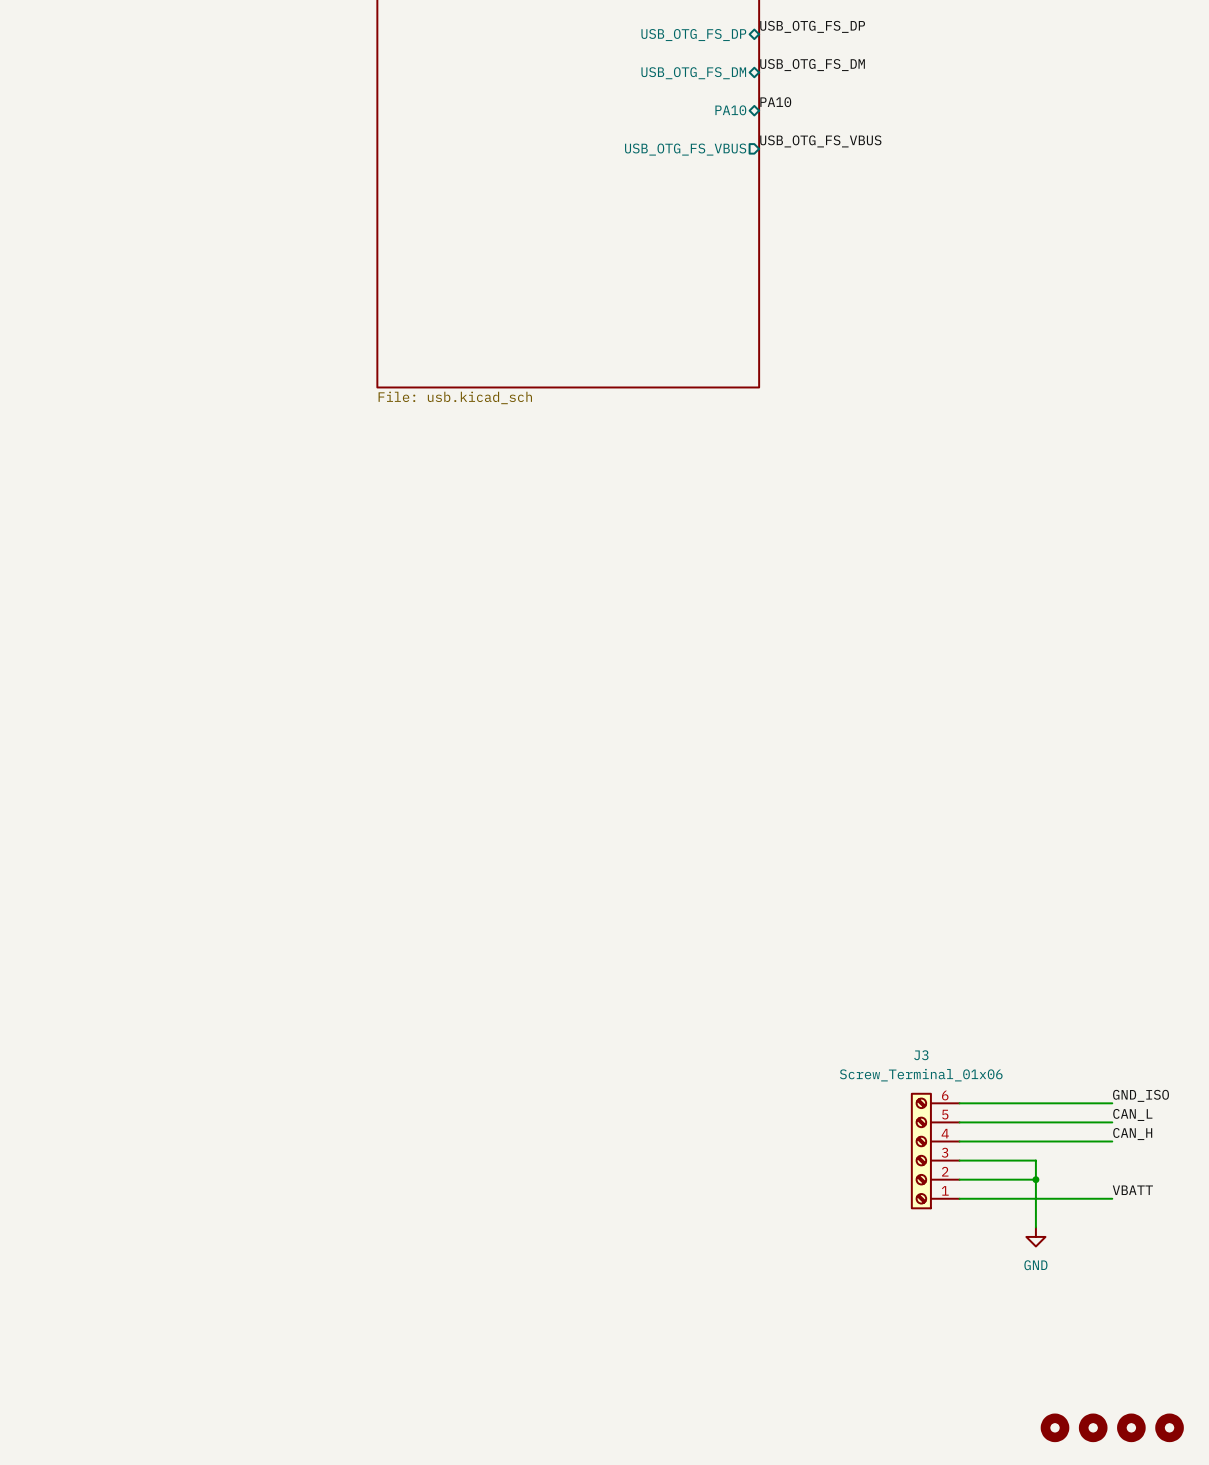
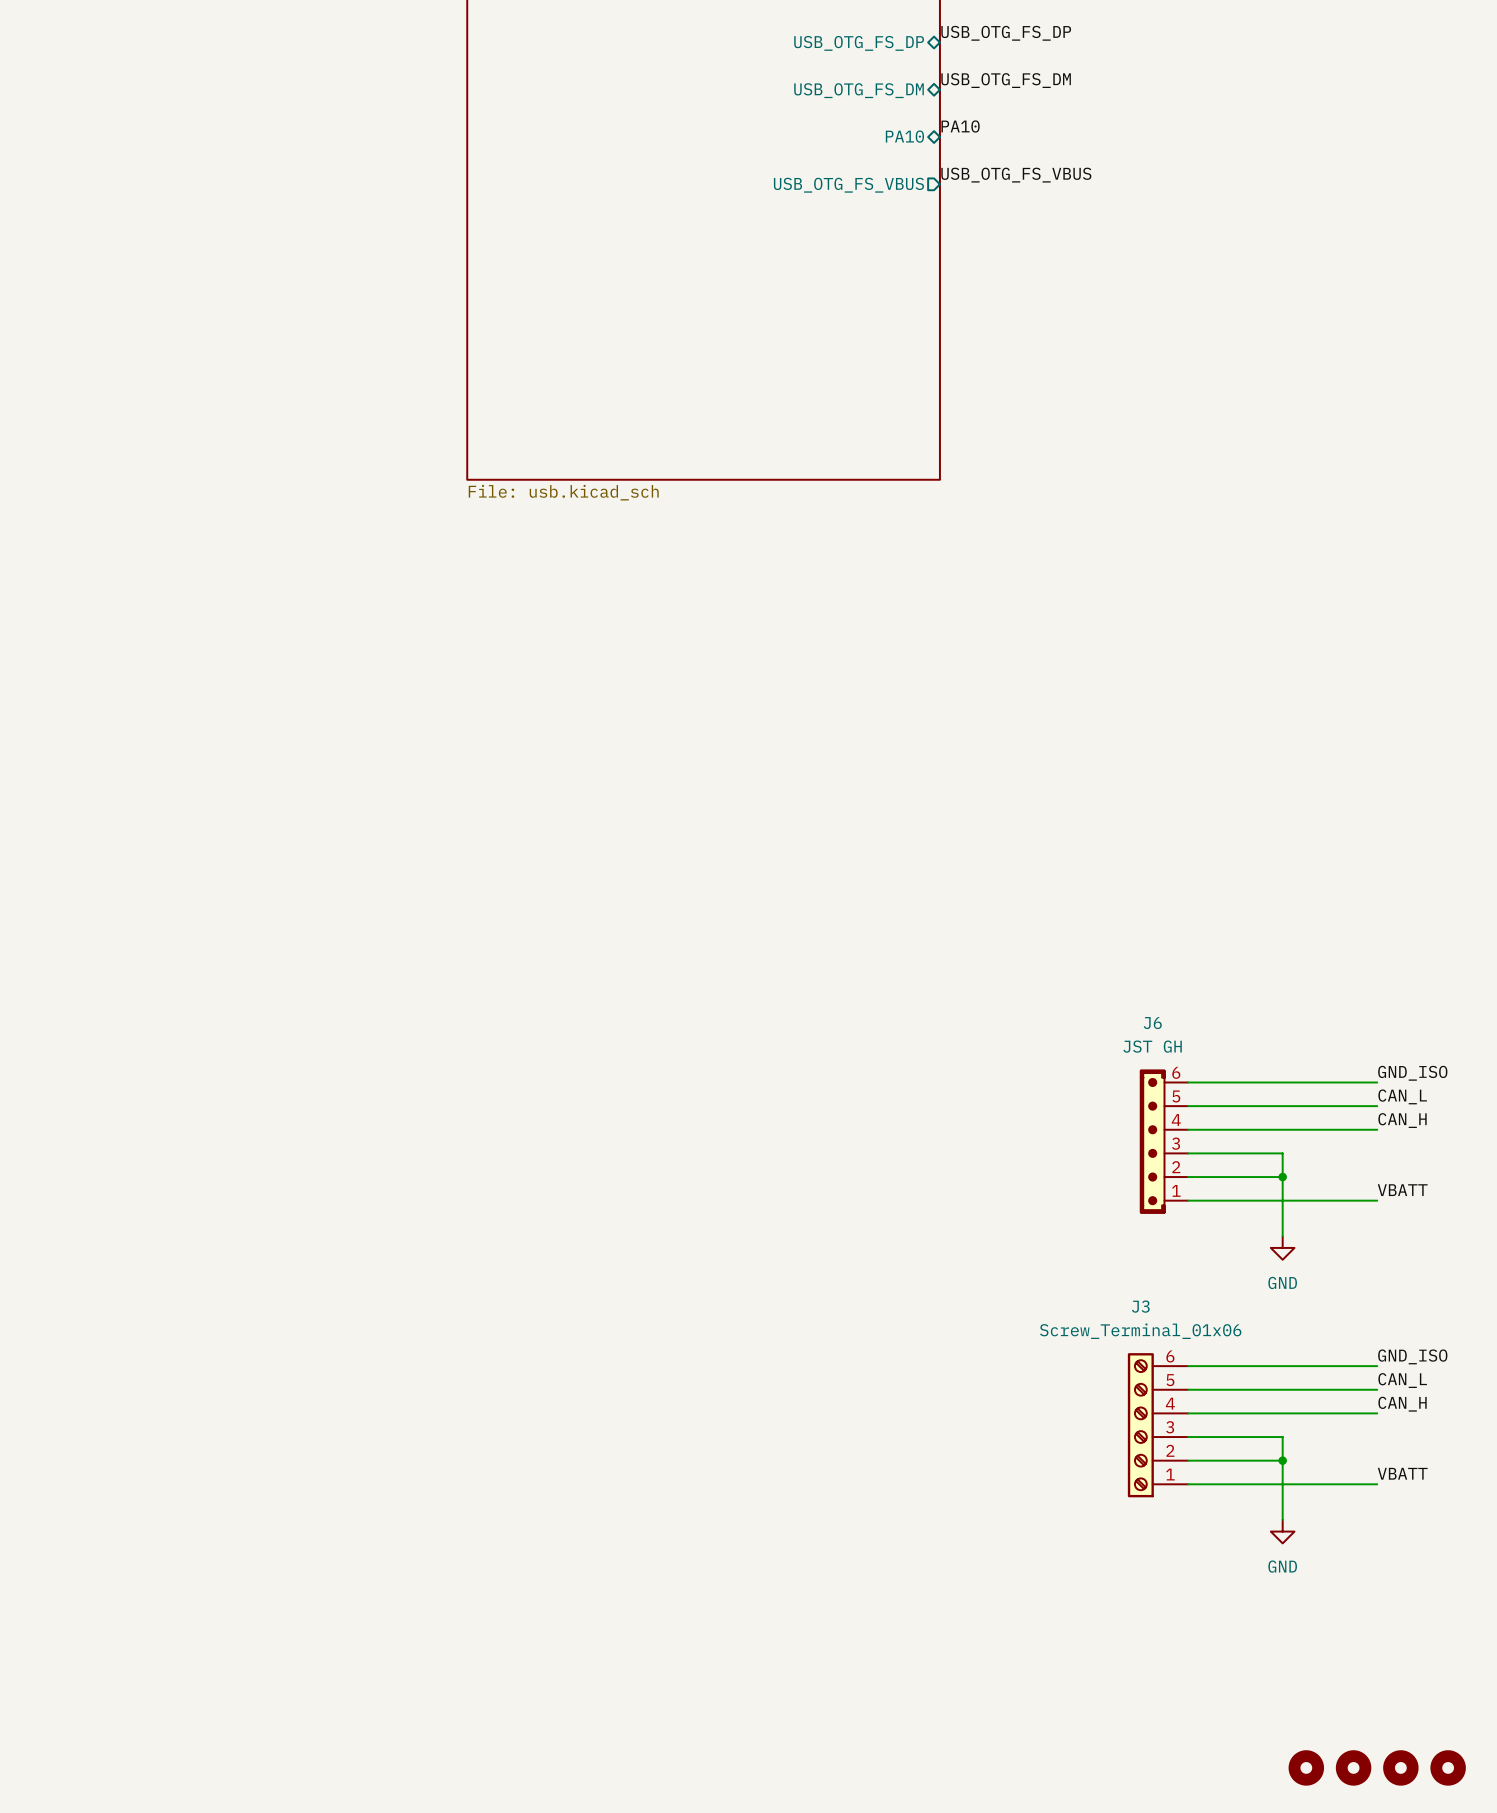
label: none -> GND_ISO (1412, 1073)
wire: none -> (1188, 1082) (1377, 1082)
label: none -> CAN_L (1402, 1096)
wire: none -> (1188, 1106) (1377, 1106)
label: none -> CAN_H (1402, 1120)
wire: none -> (1188, 1129) (1377, 1129)
J6: none -> JST GH (1164, 1141)
wire: none -> (1188, 1153) (1282, 1153) (1282, 1236)
wire: none -> (1188, 1177) (1282, 1177)
junction: none -> (1282, 1177)
label: none -> VBATT (1402, 1190)
wire: none -> (1188, 1200) (1377, 1200)
power symbol: none -> GND (1282, 1247)

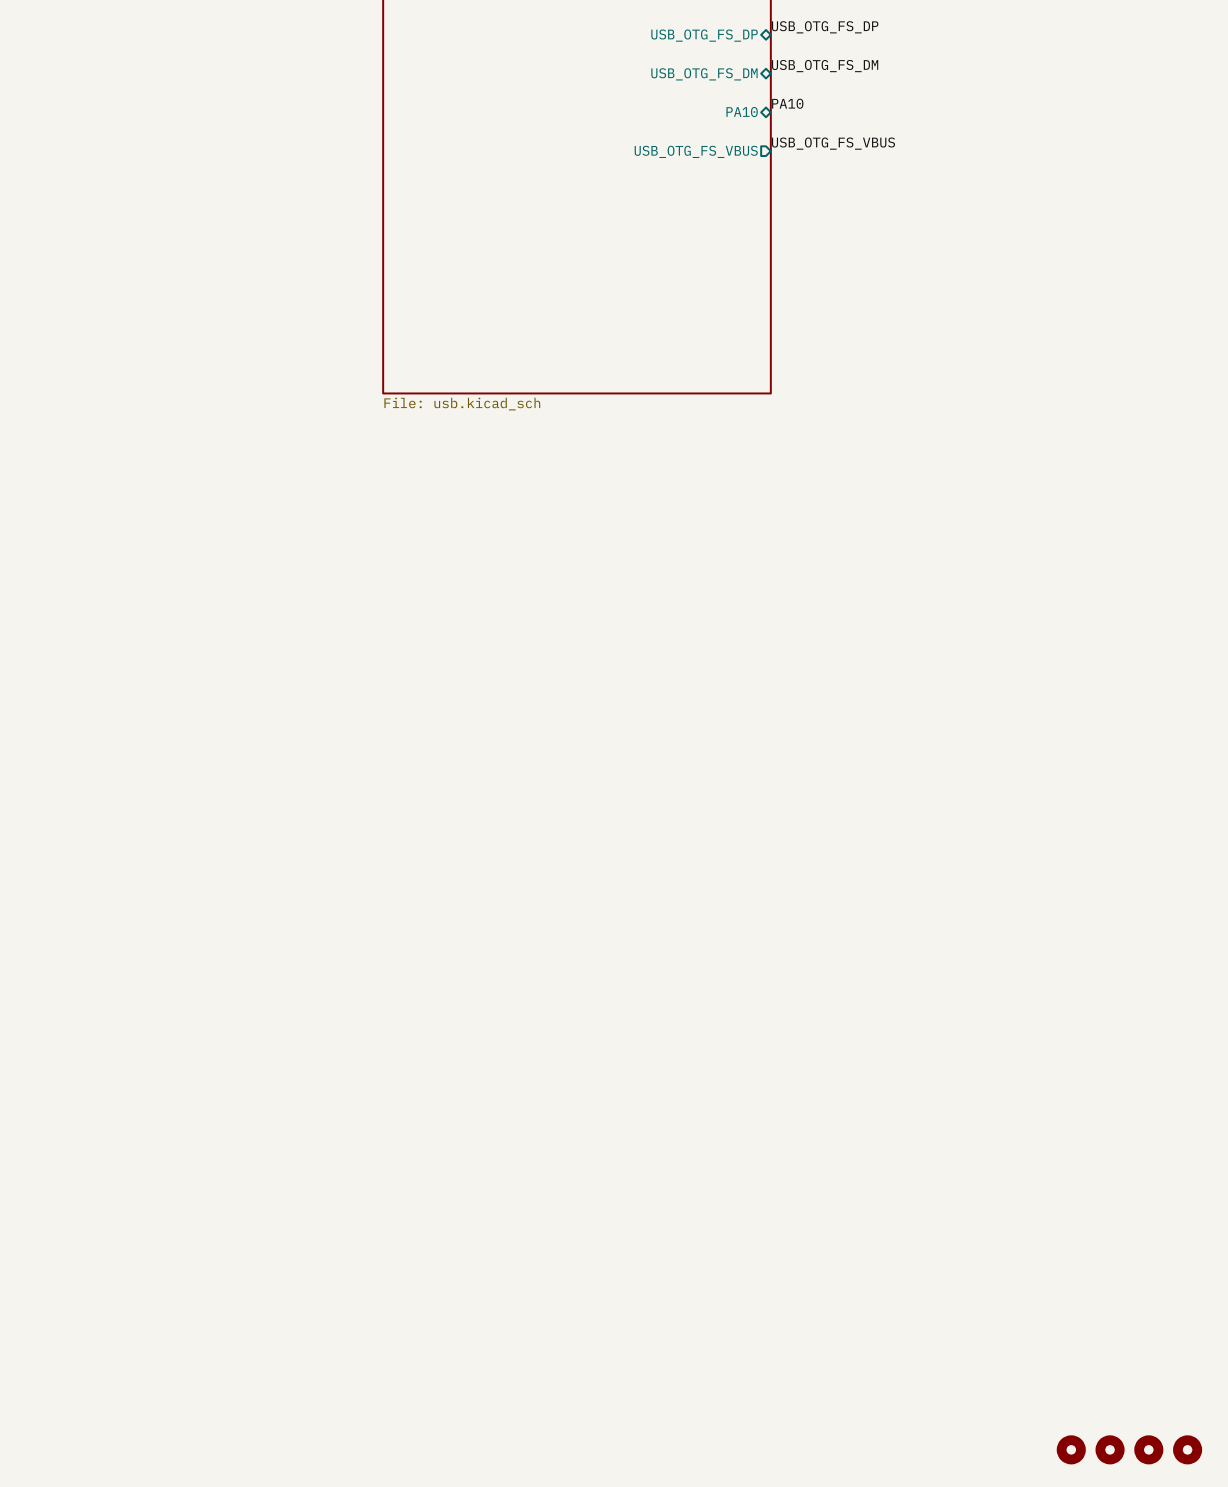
label: GND_ISO (1412, 1073) -> none
wire: (1188, 1082) (1377, 1082) -> none
label: CAN_L (1402, 1096) -> none
wire: (1188, 1106) (1377, 1106) -> none
label: CAN_H (1402, 1120) -> none
wire: (1188, 1129) (1377, 1129) -> none
J6: JST GH (1164, 1141) -> none
wire: (1188, 1153) (1282, 1153) (1282, 1236) -> none
wire: (1188, 1177) (1282, 1177) -> none
junction: (1282, 1177) -> none
label: VBATT (1402, 1190) -> none
wire: (1188, 1200) (1377, 1200) -> none
power symbol: GND (1282, 1247) -> none
label: GND_ISO (1412, 1356) -> none
wire: (1188, 1366) (1377, 1366) -> none
label: CAN_L (1402, 1380) -> none
wire: (1188, 1389) (1377, 1389) -> none
label: CAN_H (1402, 1404) -> none
wire: (1188, 1413) (1377, 1413) -> none
J3: Screw_Terminal_01x06 (1157, 1425) -> none
wire: (1188, 1437) (1282, 1437) (1282, 1519) -> none
wire: (1188, 1460) (1282, 1460) -> none
junction: (1282, 1460) -> none
label: VBATT (1402, 1473) -> none
wire: (1188, 1484) (1377, 1484) -> none
power symbol: GND (1282, 1531) -> none

